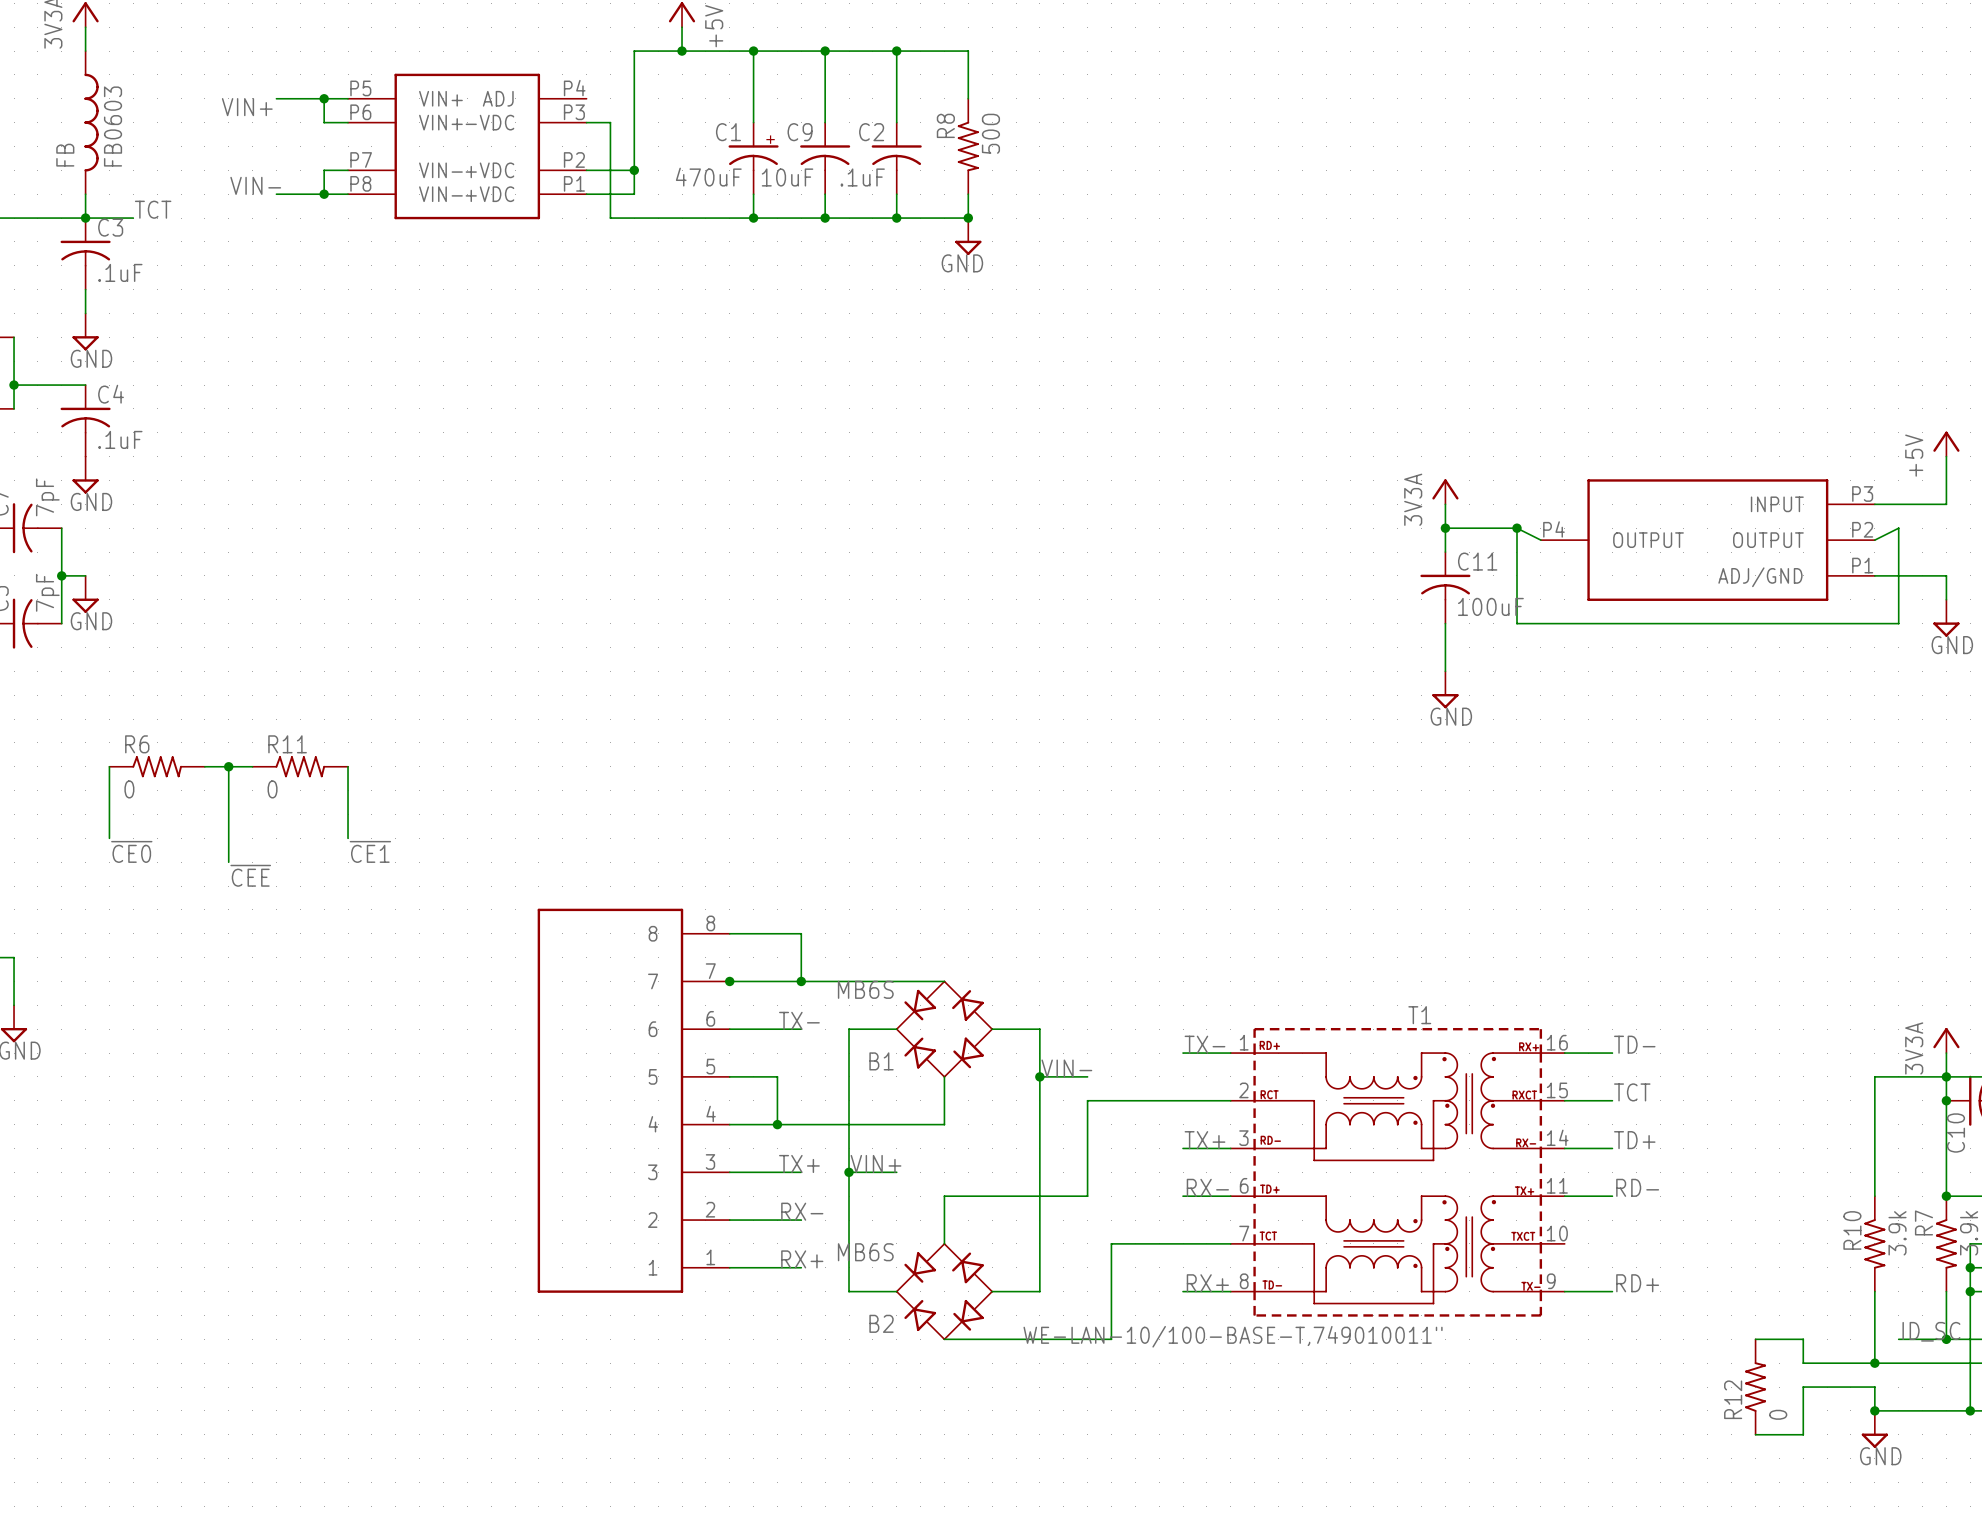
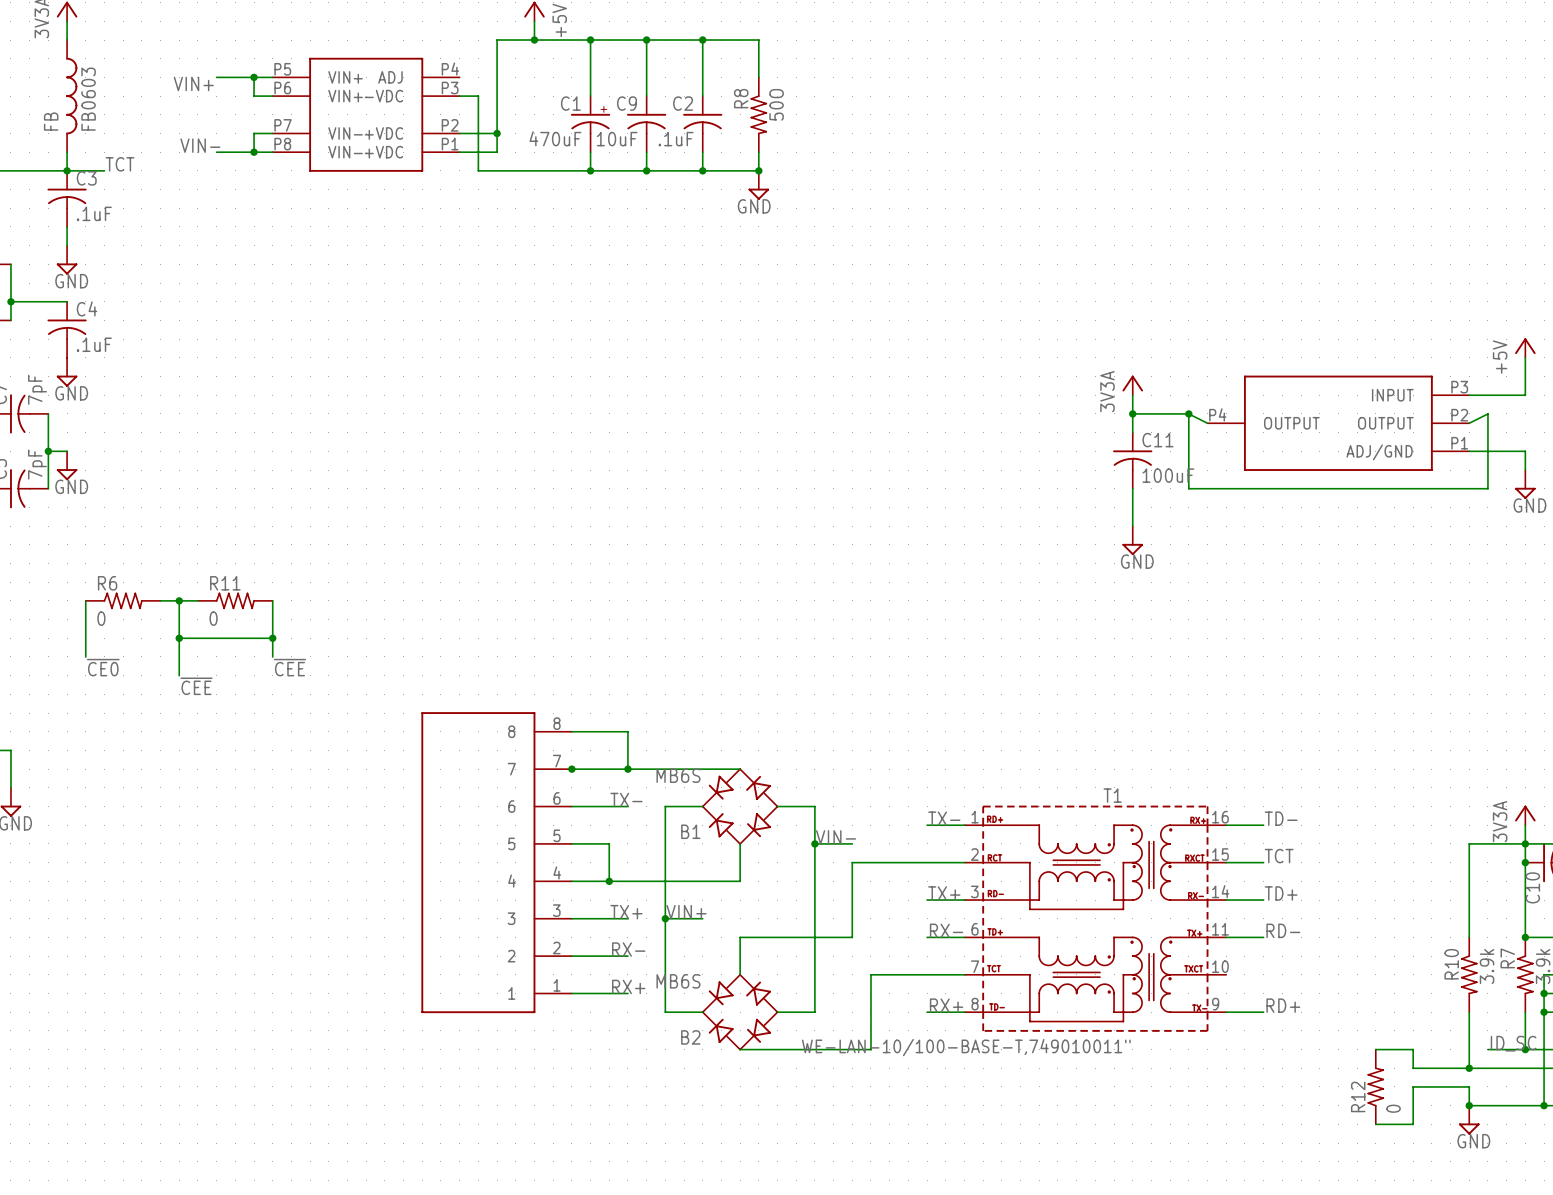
wire: none -> (179, 638) (272, 638)
junction: none -> (179, 638)
junction: none -> (272, 638)
label: ~{CE1} (370, 851) -> ~{CEE} (289, 667)

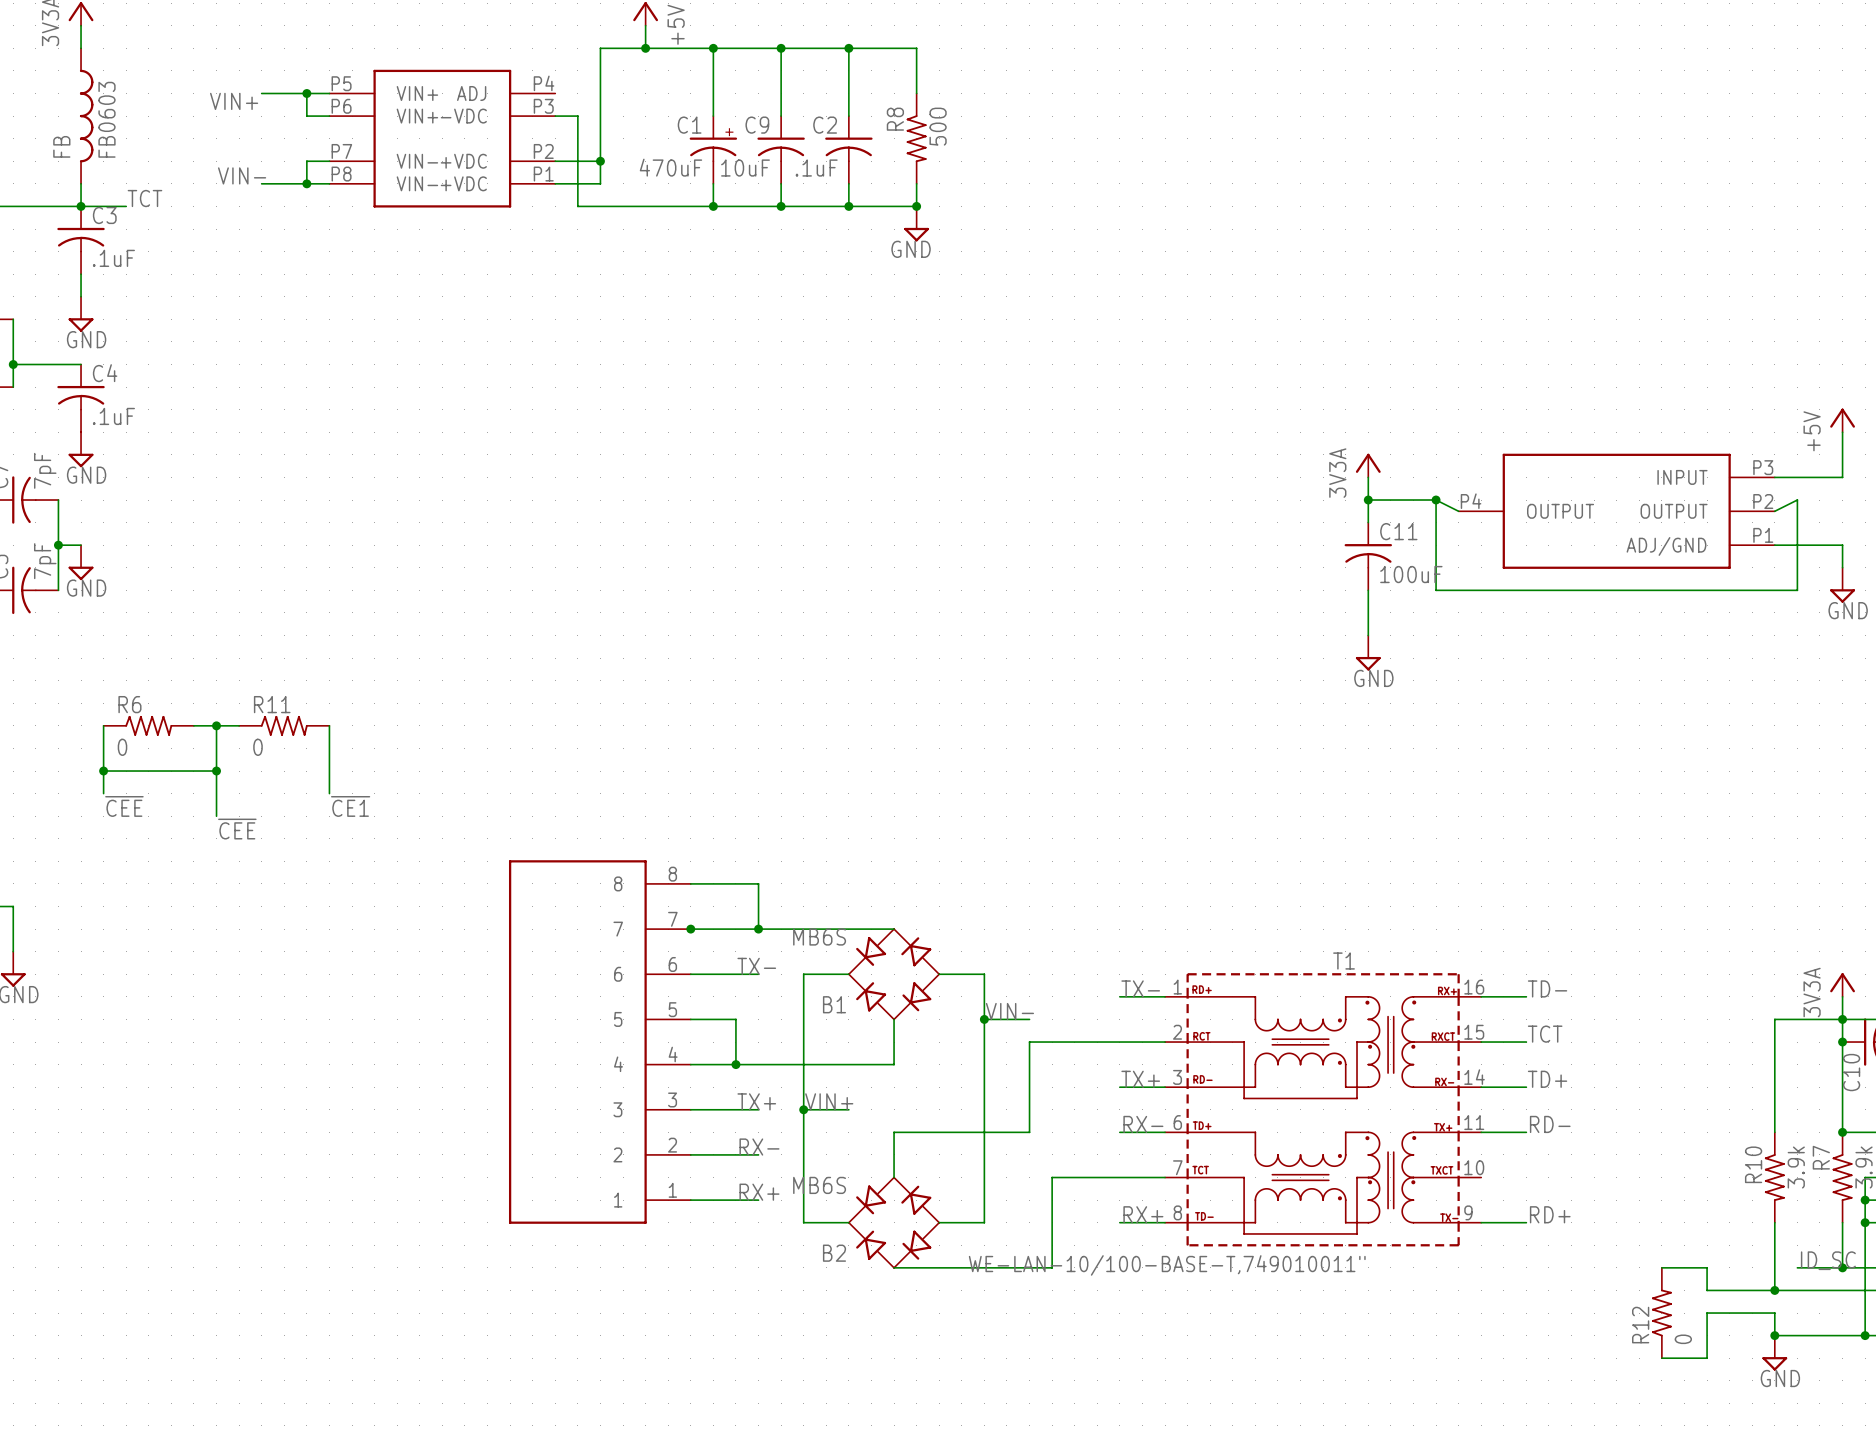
junction: none -> (103, 771)
wire: (179, 638) (272, 638) -> (216, 771) (103, 771)
junction: (272, 638) -> none
label: ~{CE0} (103, 667) -> ~{CEE} (124, 806)
label: ~{CEE} (289, 667) -> ~{CE1} (350, 806)

